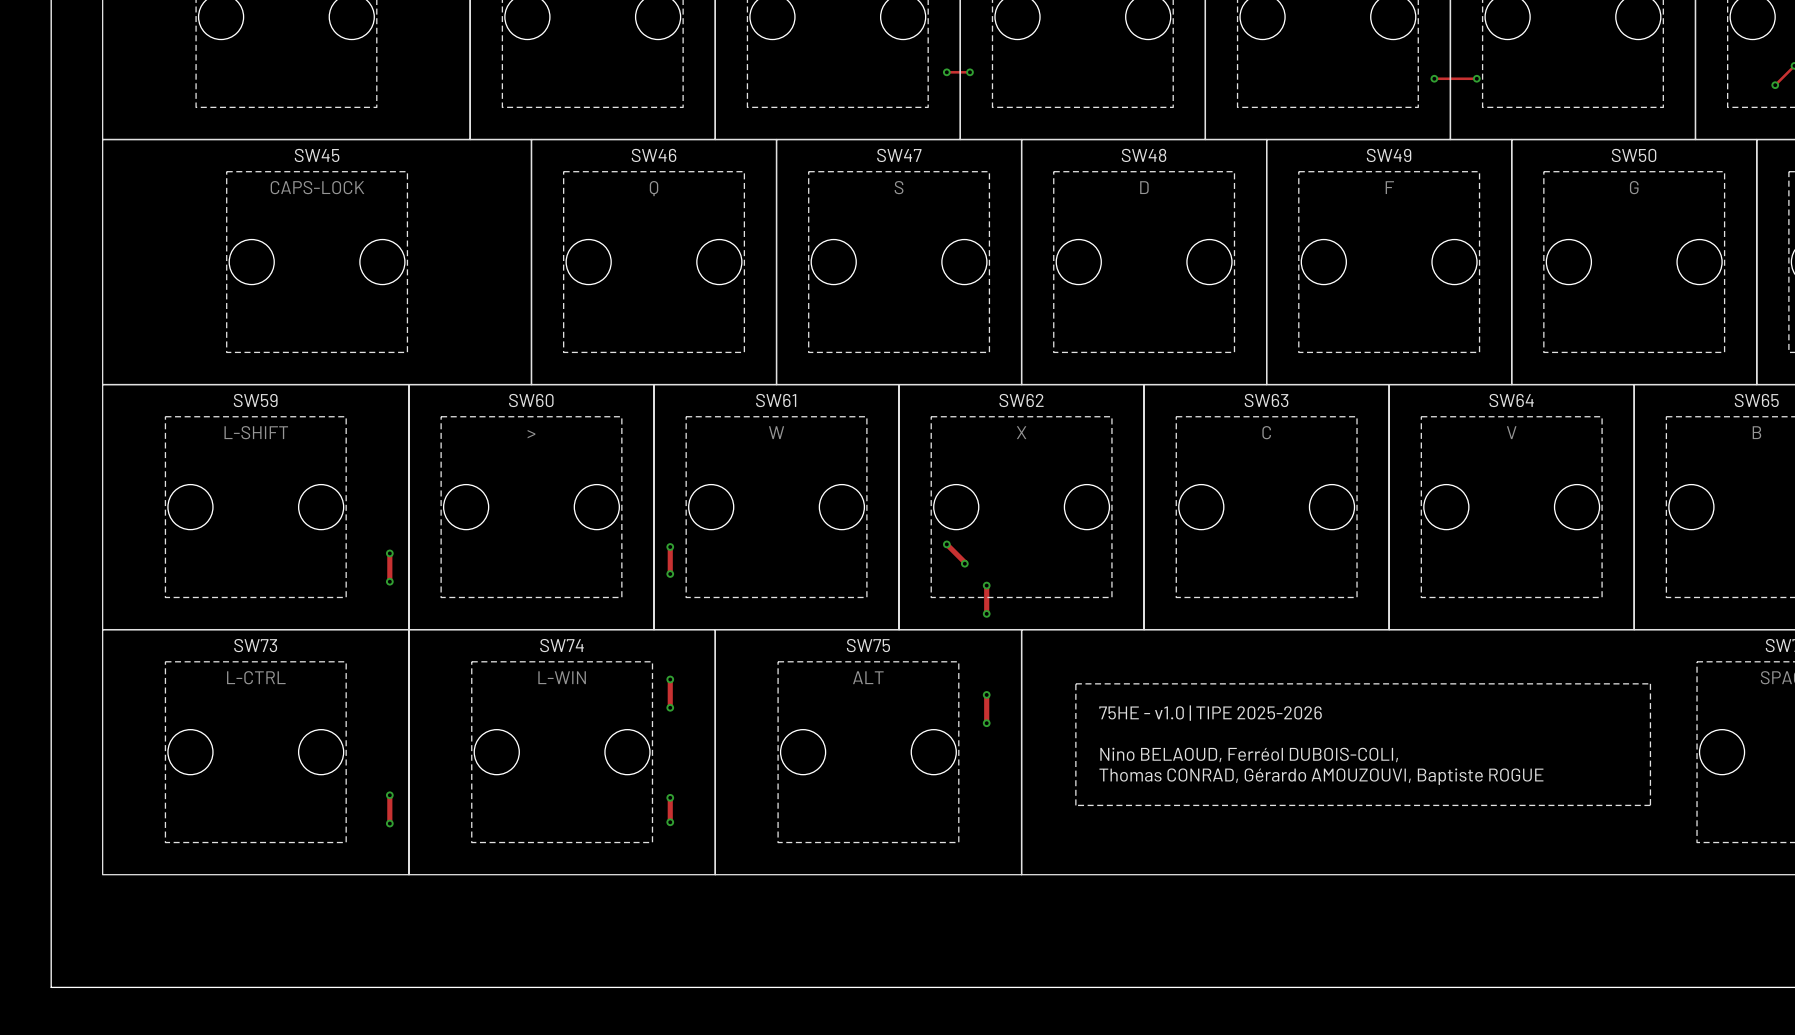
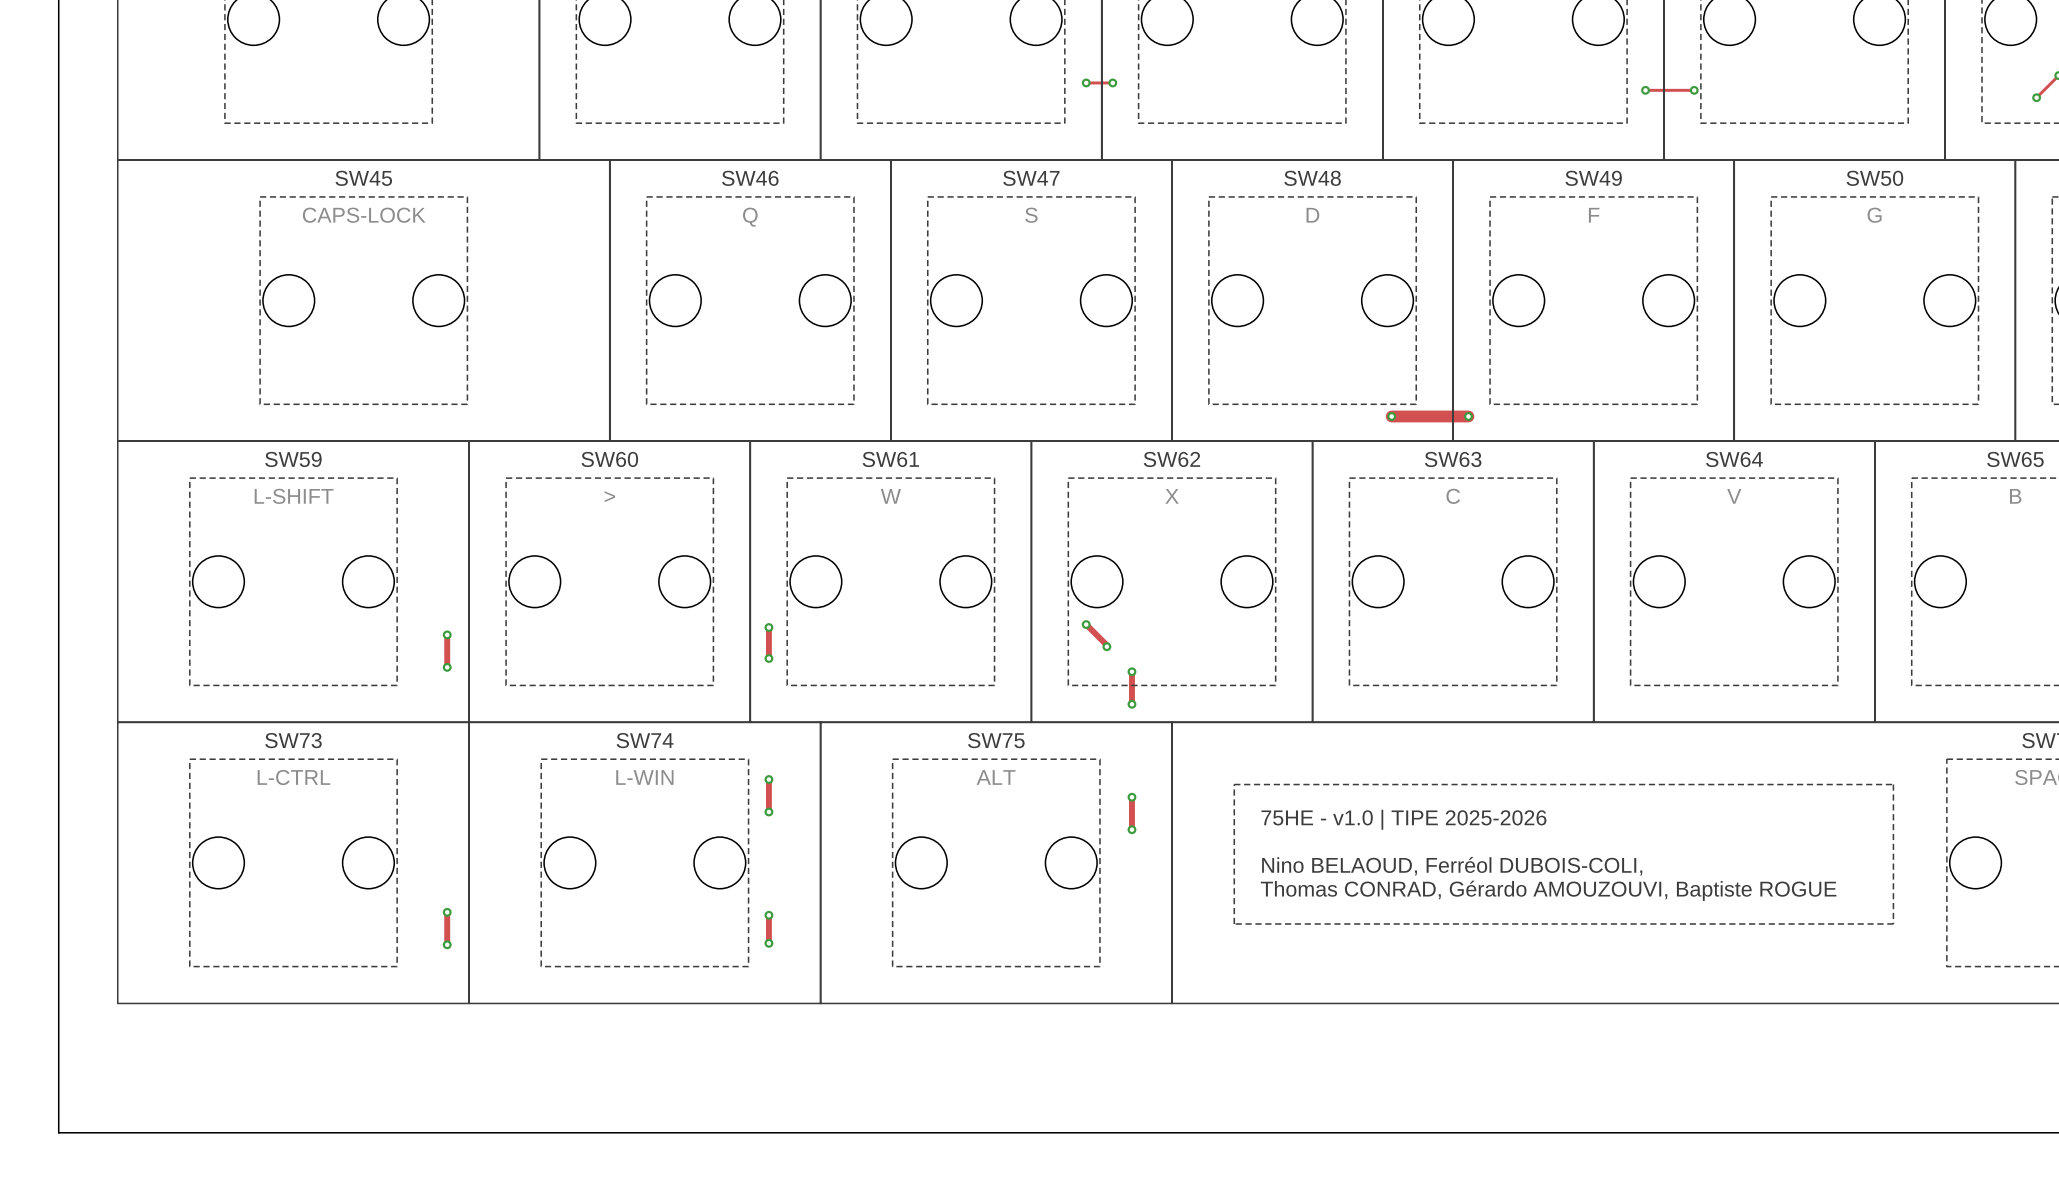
track: none -> (1391, 416) (1468, 416)
via: none -> (1391, 416)
via: none -> (1468, 416)

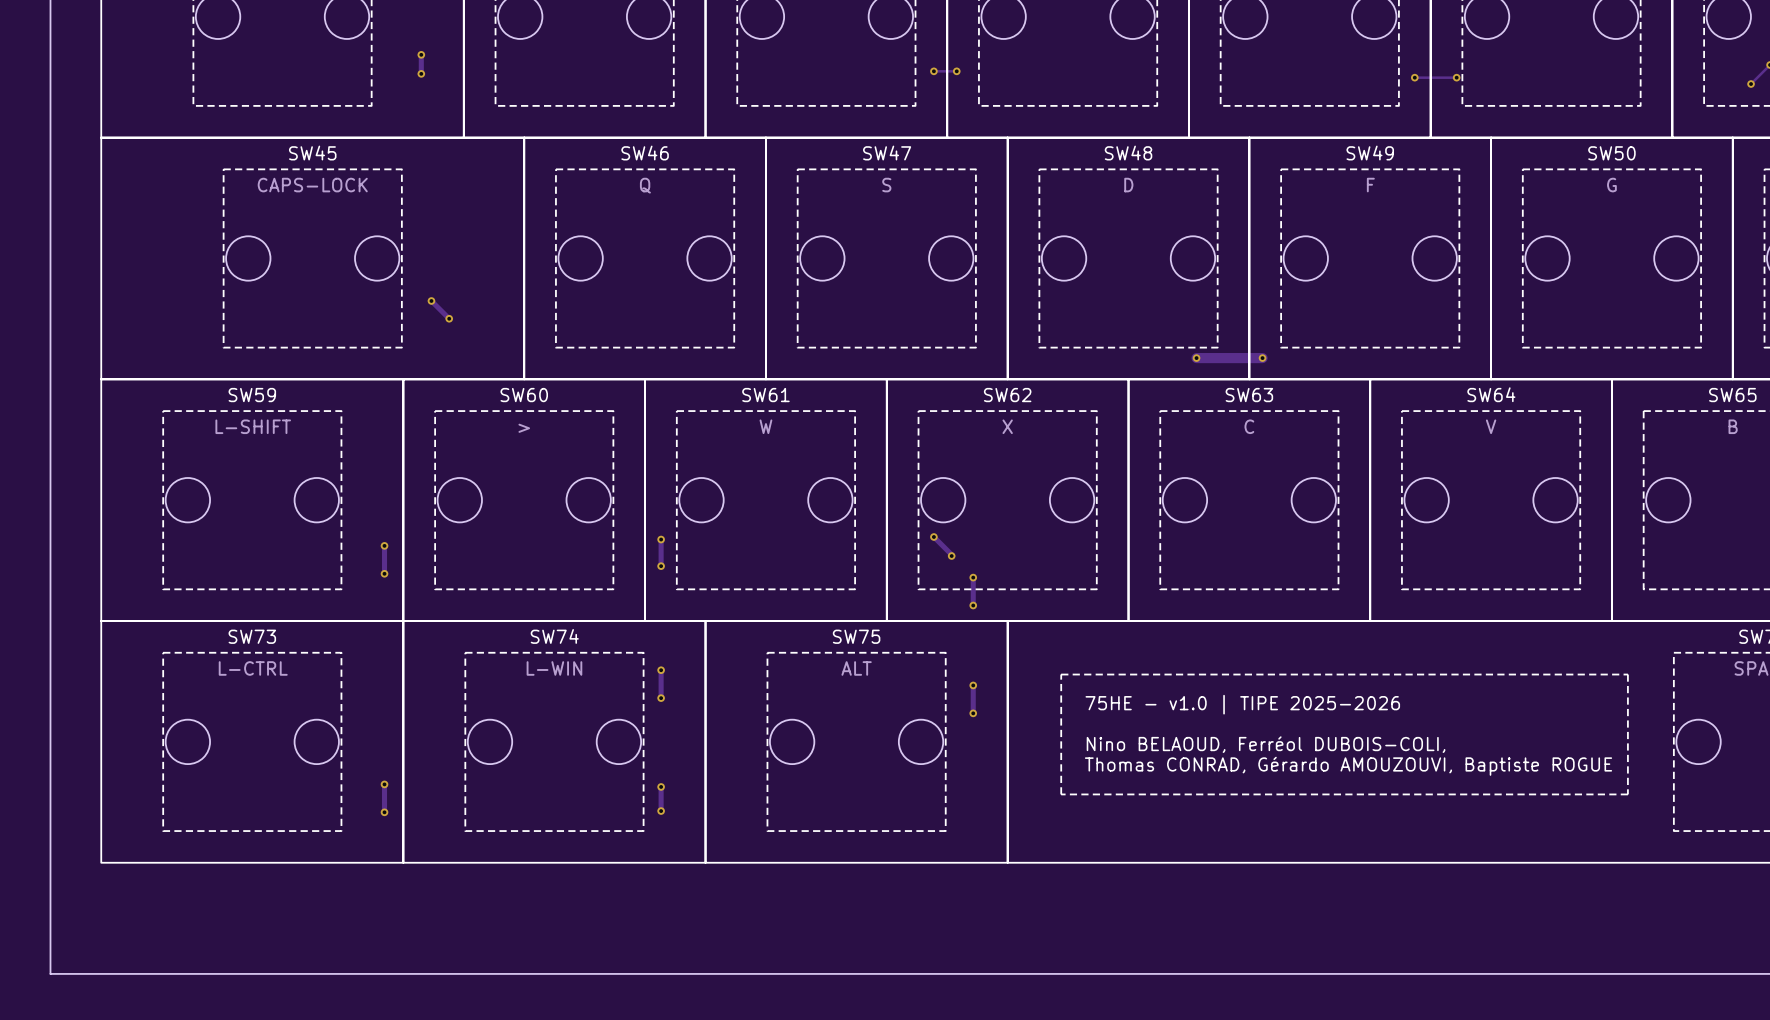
track: none -> (421, 54) (421, 73)
via: none -> (421, 54)
via: none -> (421, 73)
track: none -> (431, 300) (449, 318)
via: none -> (431, 300)
via: none -> (449, 318)

